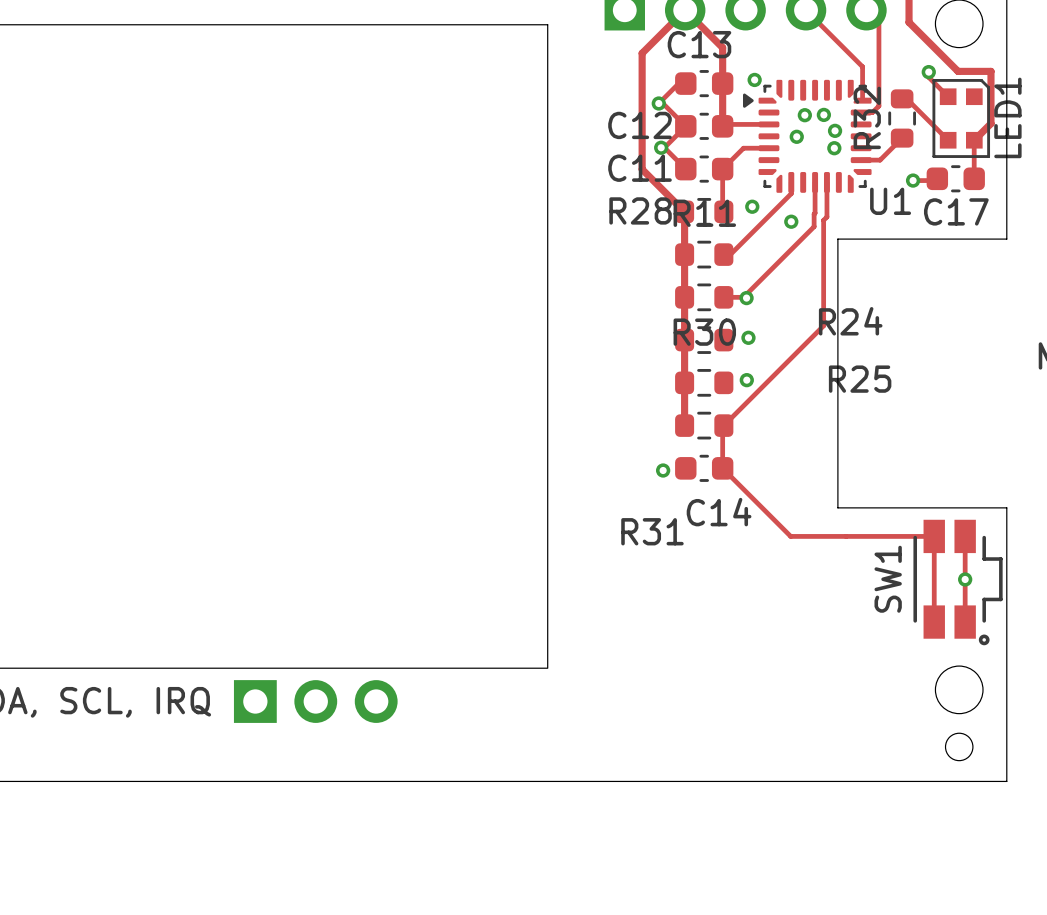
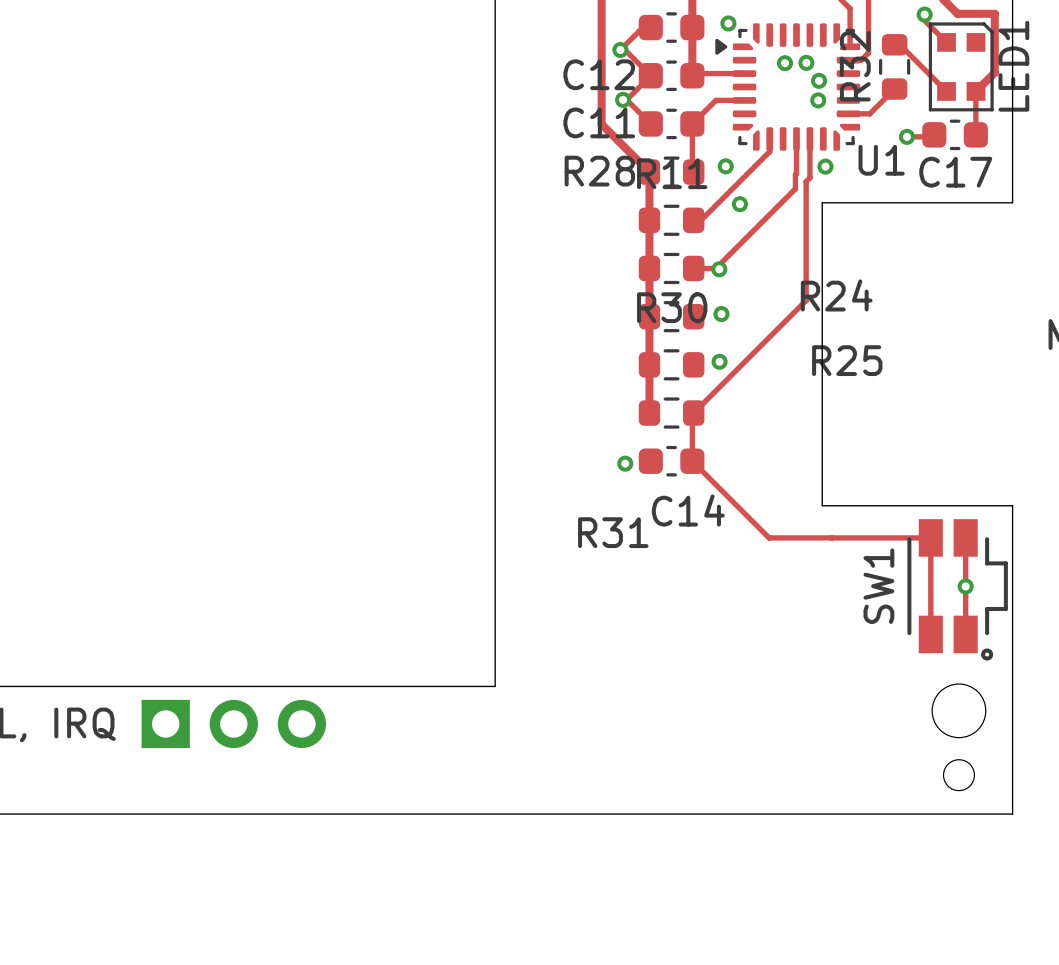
via: (796, 136) -> none
via: none -> (825, 166)
via: (791, 221) -> none
via: none -> (739, 204)

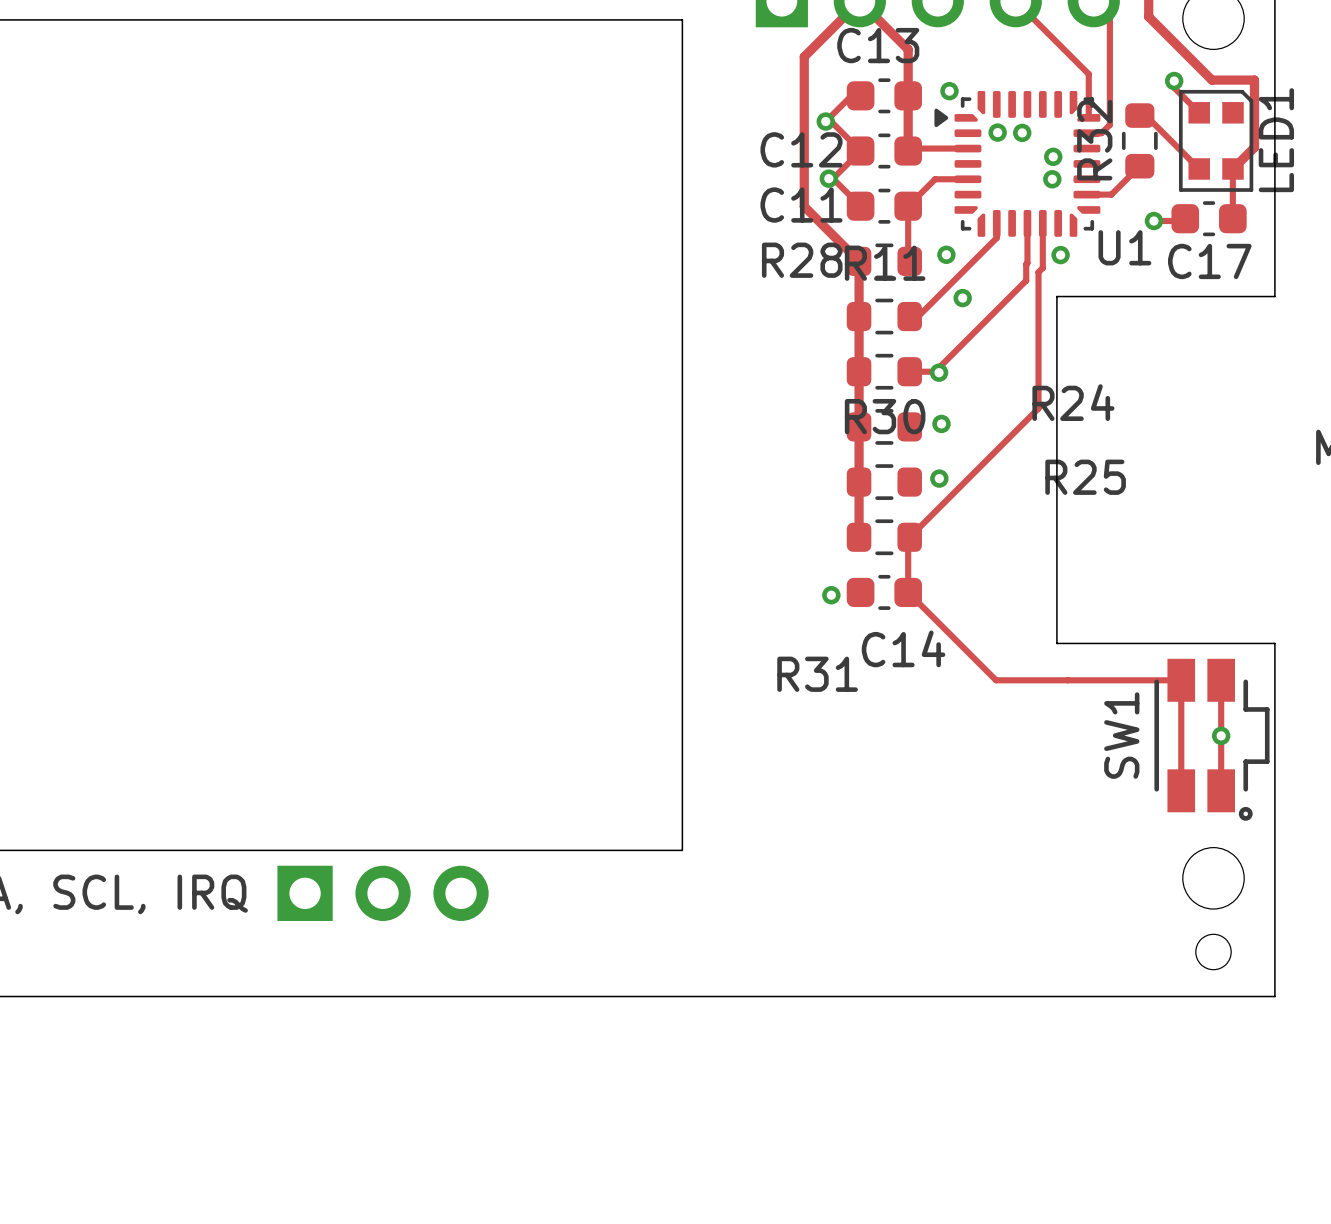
via: none -> (997, 132)
via: none -> (1022, 132)
via: (806, 62) -> none
via: (784, 63) -> none

